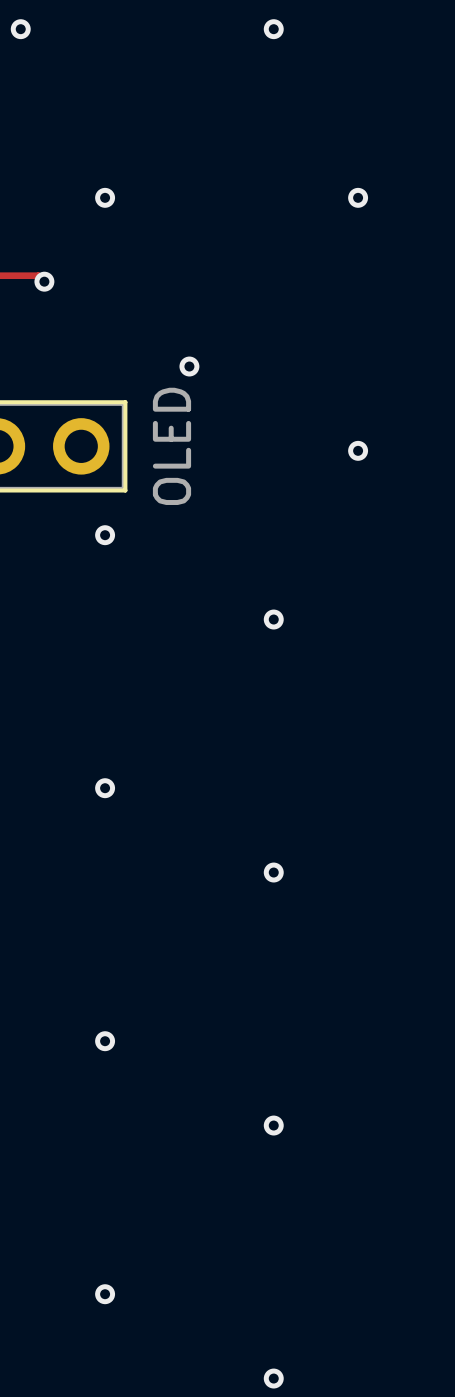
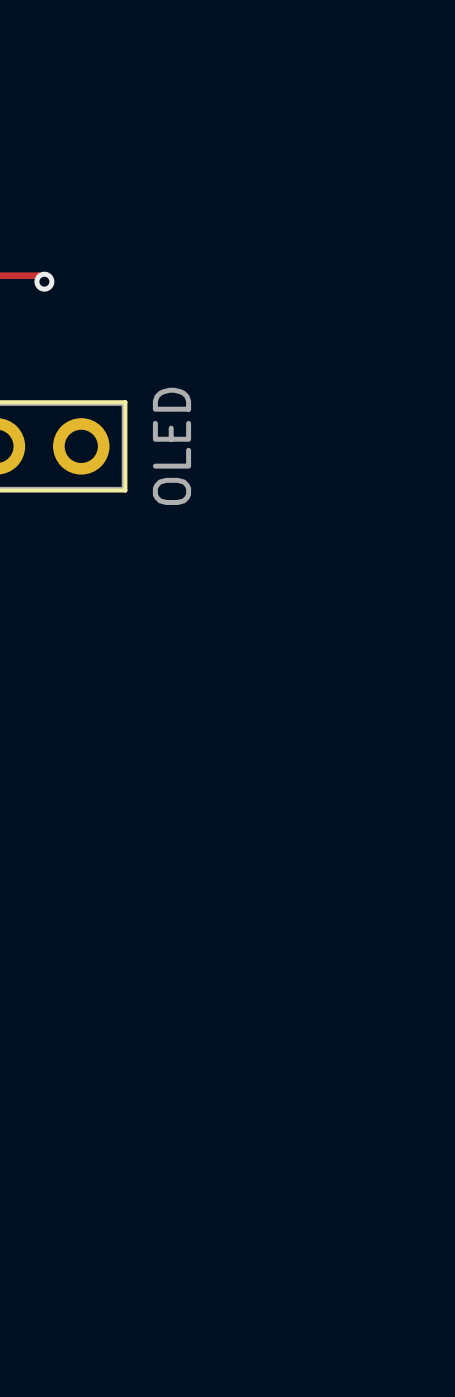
via: (20, 29) -> none
via: (273, 29) -> none
via: (105, 197) -> none
via: (358, 197) -> none
via: (189, 366) -> none
via: (358, 450) -> none
via: (105, 535) -> none
via: (273, 619) -> none
via: (105, 788) -> none
via: (273, 872) -> none
via: (105, 1041) -> none
via: (273, 1125) -> none
via: (105, 1294) -> none
via: (273, 1378) -> none

